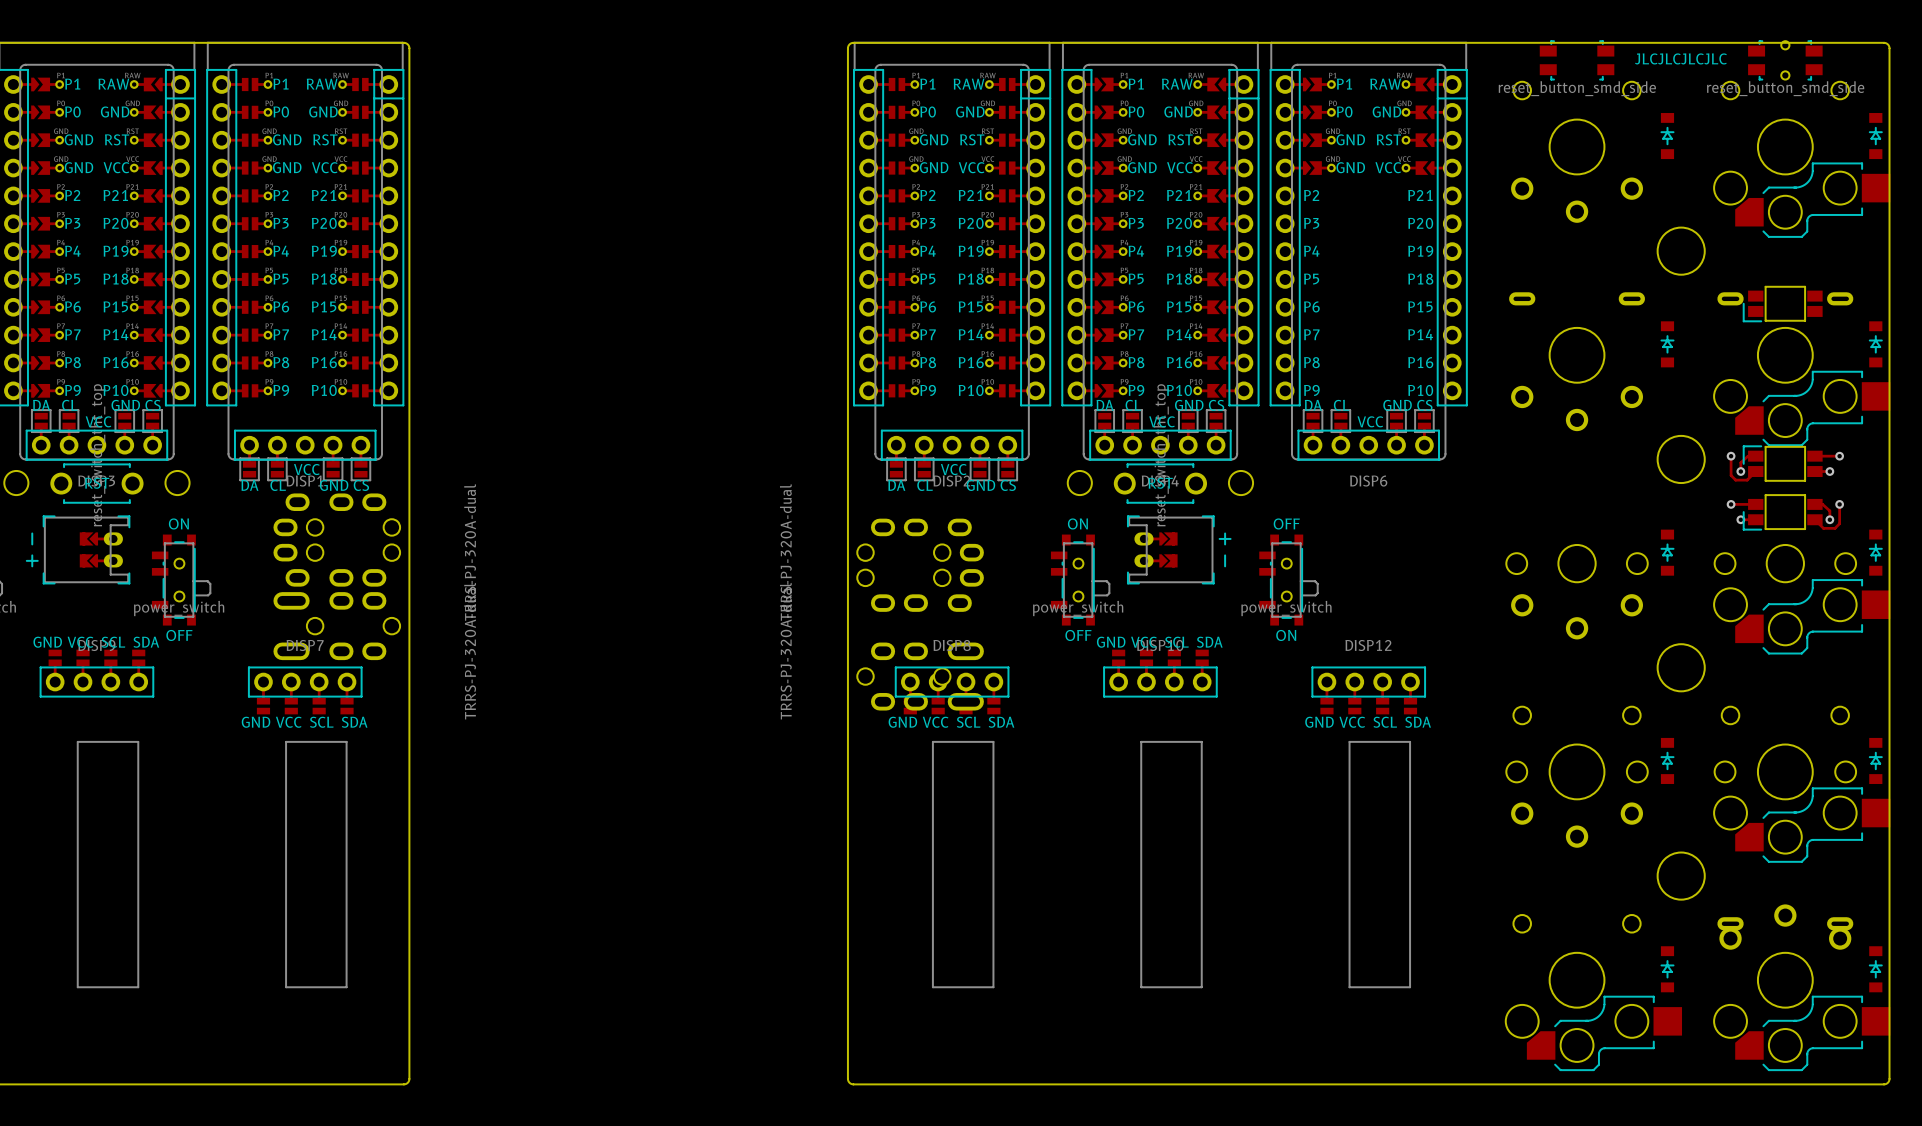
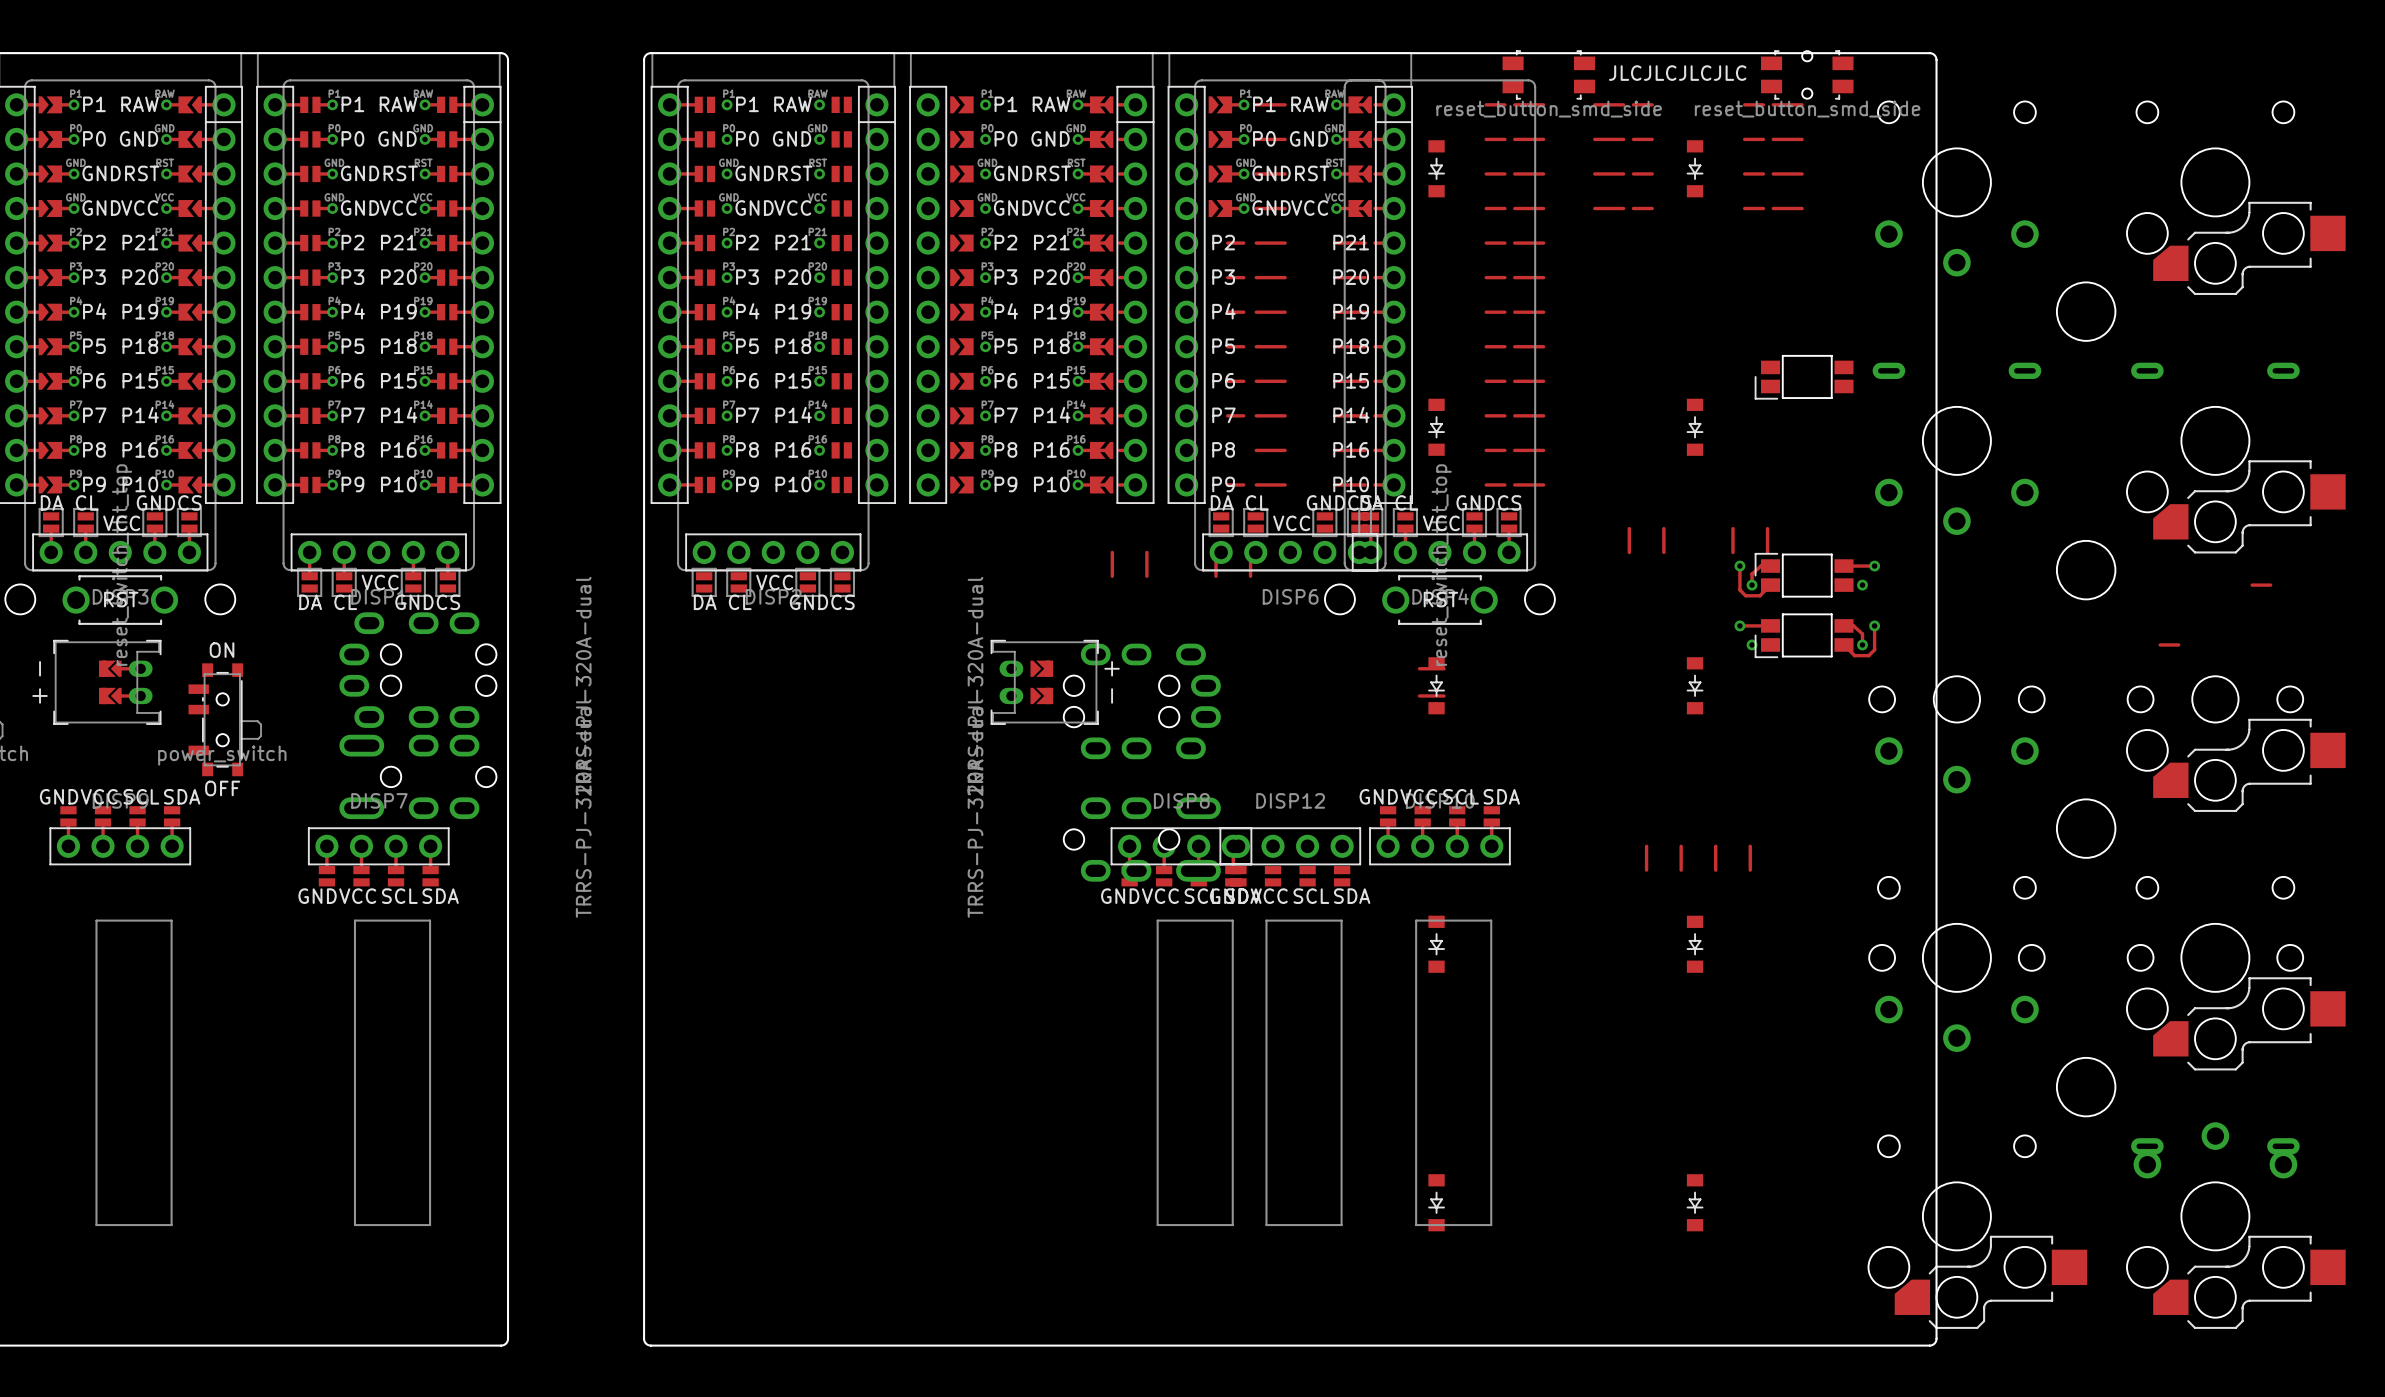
board edge: (853, 42) (849, 44) (847, 48) (847, 1078) (849, 1082) (853, 1084) -> (1059, 53) (650, 53) (646, 55) (644, 59) (644, 1340) (650, 1345) (1059, 1345)
board edge: (1555, 42) (1884, 42) (1887, 44) (1889, 48) (1889, 1080) (1884, 1084) (1555, 1084) -> (1929, 53) (1934, 55) (1936, 59) (1936, 1338) (1934, 1343) (1929, 1345)
text: none -> JLCJLCJLCJLC (1677, 73)
text: JLCJLCJLCJLC (1680, 58) -> none
part: none -> reset_button_smd_side (1548, 74)
part: none -> reset_button_smd_side (1807, 74)
part: reset_button_smd_side (1577, 60) -> none
part: reset_button_smd_side (1785, 60) -> none
track: none -> (669, 104) (698, 104)
track: none -> (669, 139) (698, 139)
part: none -> (1436, 168)
part: none -> (1695, 168)
part: (1667, 136) -> none
part: (1875, 136) -> none
track: none -> (669, 173) (698, 173)
track: none -> (669, 208) (698, 208)
track: none -> (669, 243) (698, 243)
track: none -> (669, 277) (698, 277)
part: none -> (773, 278)
part: none -> (1031, 278)
part: (952, 224) -> none
part: none -> (1290, 278)
part: (1160, 224) -> none
part: (1368, 224) -> none
track: none -> (669, 312) (698, 312)
DISP6 position: (1368, 262) -> (1290, 325)
DISP2 position: (952, 272) -> (773, 338)
track: none -> (669, 346) (698, 346)
part: none -> (1804, 377)
part: (1782, 304) -> none
track: none -> (669, 381) (698, 381)
track: none -> (669, 415) (698, 415)
part: none -> (1436, 427)
part: none -> (1695, 427)
part: (1667, 344) -> none
part: (1875, 344) -> none
track: none -> (669, 450) (698, 450)
track: (989, 362) (1002, 362) -> none
track: none -> (669, 484) (698, 484)
track: none -> (1739, 566) (1739, 589) (1745, 595) (1759, 595) (1770, 585)
via: none -> (1739, 566)
track: none -> (1770, 566) (1761, 566) (1752, 574) (1752, 585)
via: none -> (1874, 566)
track: (1731, 456) (1731, 475) (1735, 480) (1747, 480) (1755, 471) -> none
via: (1731, 456) -> none
track: (1755, 456) (1748, 456) (1740, 462) (1740, 471) -> none
track: (1814, 456) (1839, 456) -> none
via: (1839, 456) -> none
part: none -> (1804, 575)
part: (1782, 463) -> none
via: none -> (1752, 585)
via: none -> (1862, 585)
via: (1740, 471) -> none
via: (1829, 471) -> none
track: none -> (1739, 625) (1770, 625)
via: none -> (1739, 625)
track: none -> (1844, 625) (1853, 625) (1862, 633) (1862, 644)
track: none -> (1874, 625) (1874, 649) (1868, 655) (1854, 655) (1844, 644)
via: none -> (1874, 625)
track: (1731, 504) (1755, 504) -> (1844, 566) (1874, 566)
via: (1731, 504) -> none
track: (1814, 504) (1822, 504) (1829, 510) (1829, 519) -> none
track: (1839, 504) (1839, 523) (1835, 528) (1823, 528) (1814, 519) -> none
via: (1839, 504) -> none
part: none -> (1804, 635)
part: (1782, 512) -> none
via: none -> (1752, 644)
via: none -> (1862, 644)
via: (1740, 519) -> none
via: (1829, 519) -> none
part: none -> (1055, 682)
part: (1179, 549) -> none
part: none -> (1436, 685)
part: none -> (1695, 685)
part: (1667, 552) -> none
part: (1875, 552) -> none
part: power_switch (1080, 580) -> none
part: power_switch (1288, 580) -> none
part: none -> (1436, 944)
part: none -> (1695, 944)
part: (1667, 760) -> none
part: (1875, 760) -> none
DISP12 position: (1368, 827) -> (1290, 1026)
part: none -> (1436, 1202)
part: none -> (1695, 1202)
part: (1667, 969) -> none
part: (1875, 969) -> none

